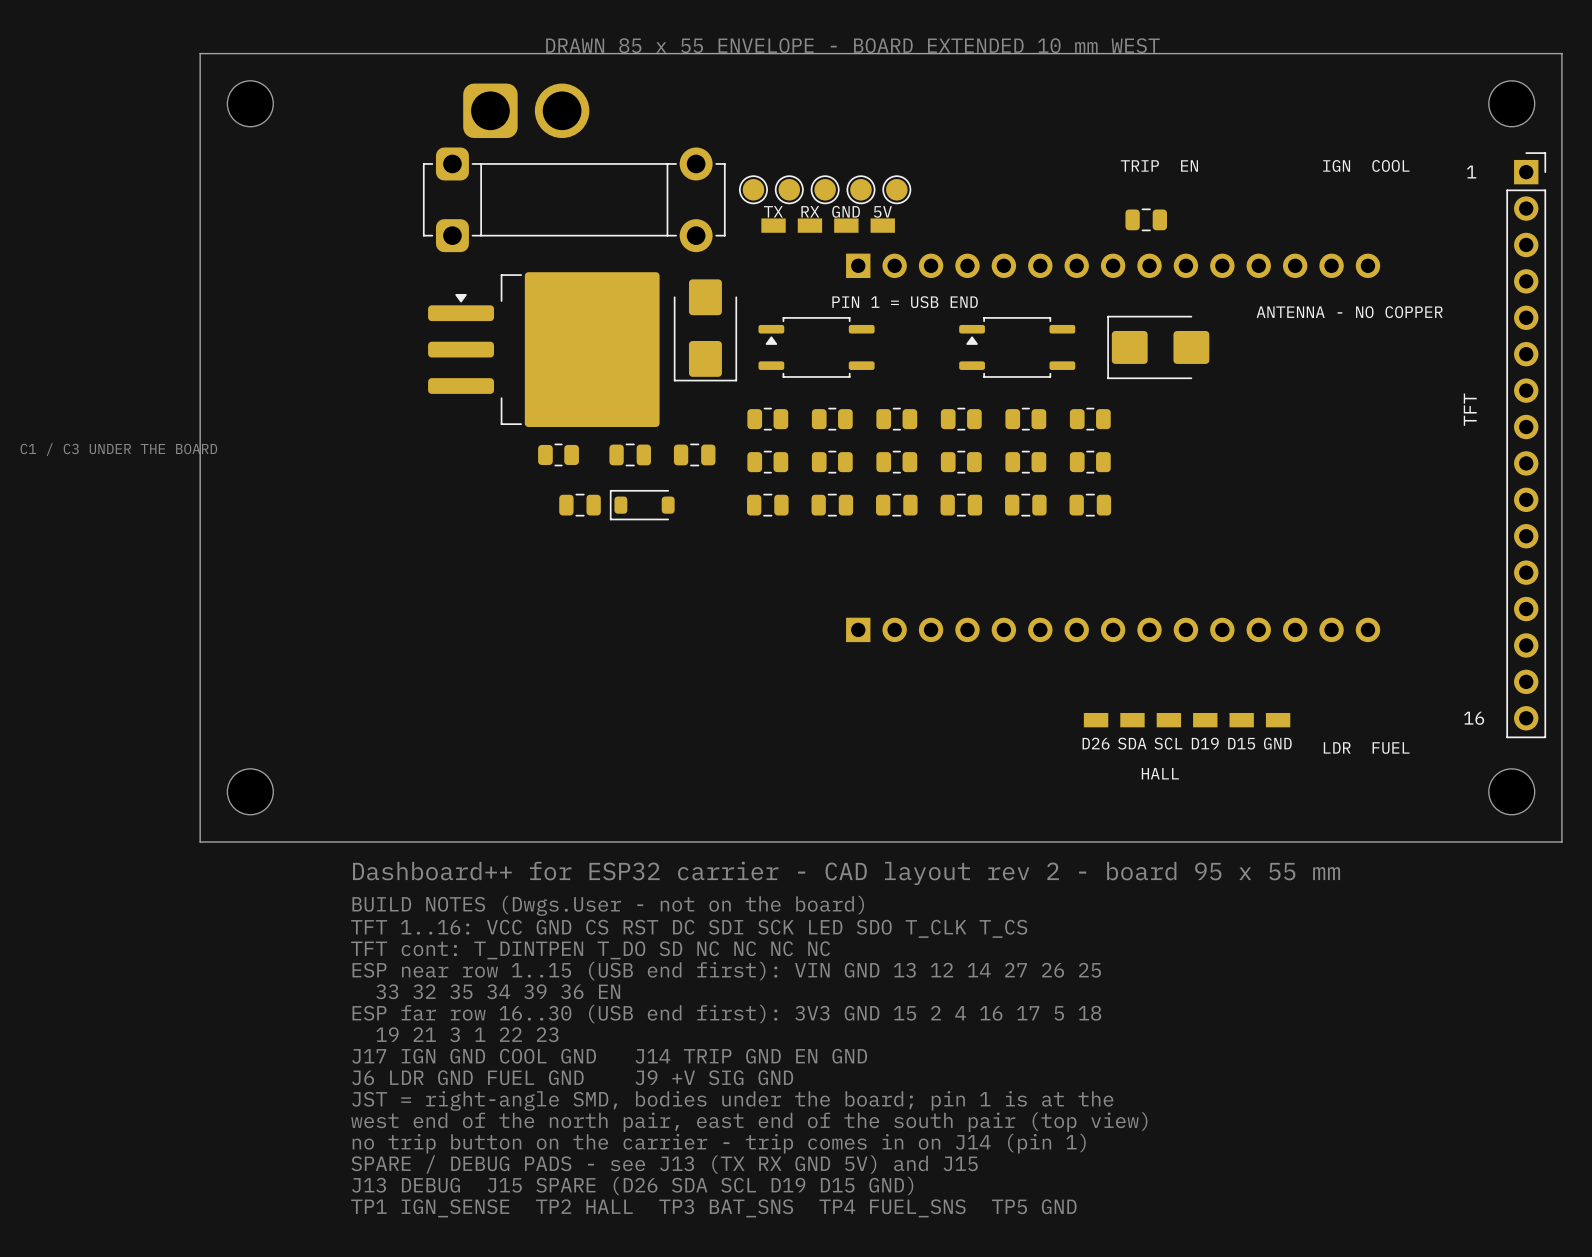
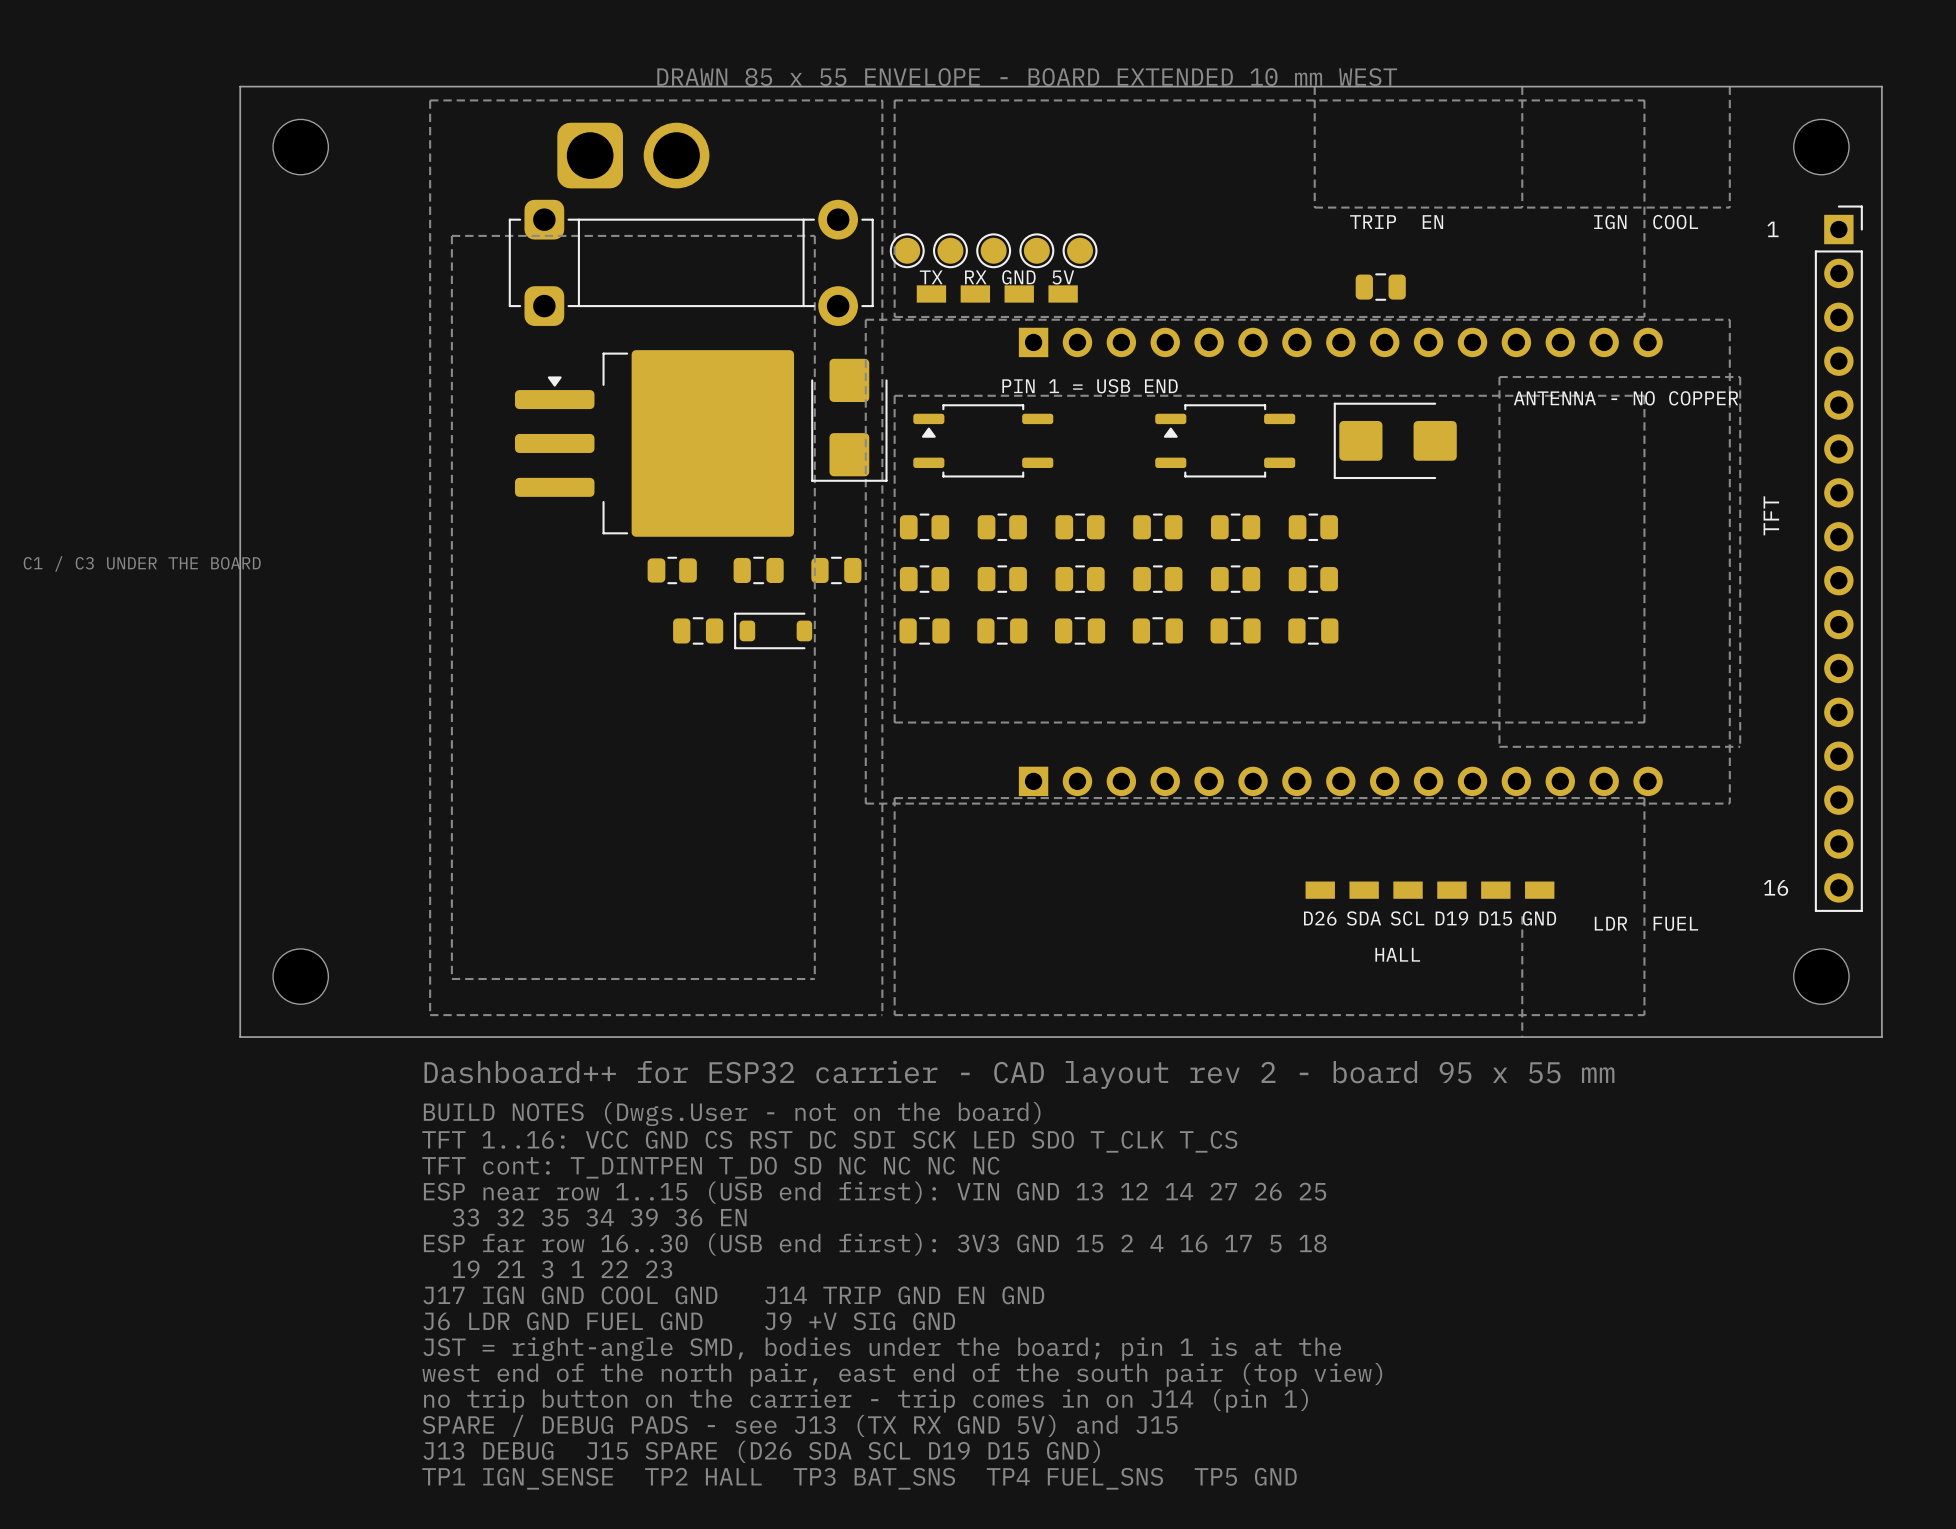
line: none -> (1314, 86) (1314, 207) (1729, 207) (1729, 86)
line: none -> (1522, 86) (1522, 207)
line: none -> (430, 100) (430, 1015) (882, 1015) (882, 100) (430, 100)
line: none -> (894, 100) (894, 316) (1644, 316) (1644, 100) (894, 100)
line: none -> (451, 235) (814, 235) (814, 978) (451, 978) (451, 235)
line: none -> (865, 319) (1729, 319) (1729, 803) (865, 803) (865, 319)
line: none -> (1499, 377) (1740, 377) (1740, 746) (1499, 746) (1499, 377)
line: none -> (894, 395) (894, 722) (1644, 722) (1644, 395) (894, 395)
line: none -> (894, 798) (1644, 798) (1644, 1015) (894, 1015) (894, 798)
line: none -> (1522, 916) (1522, 1037)

